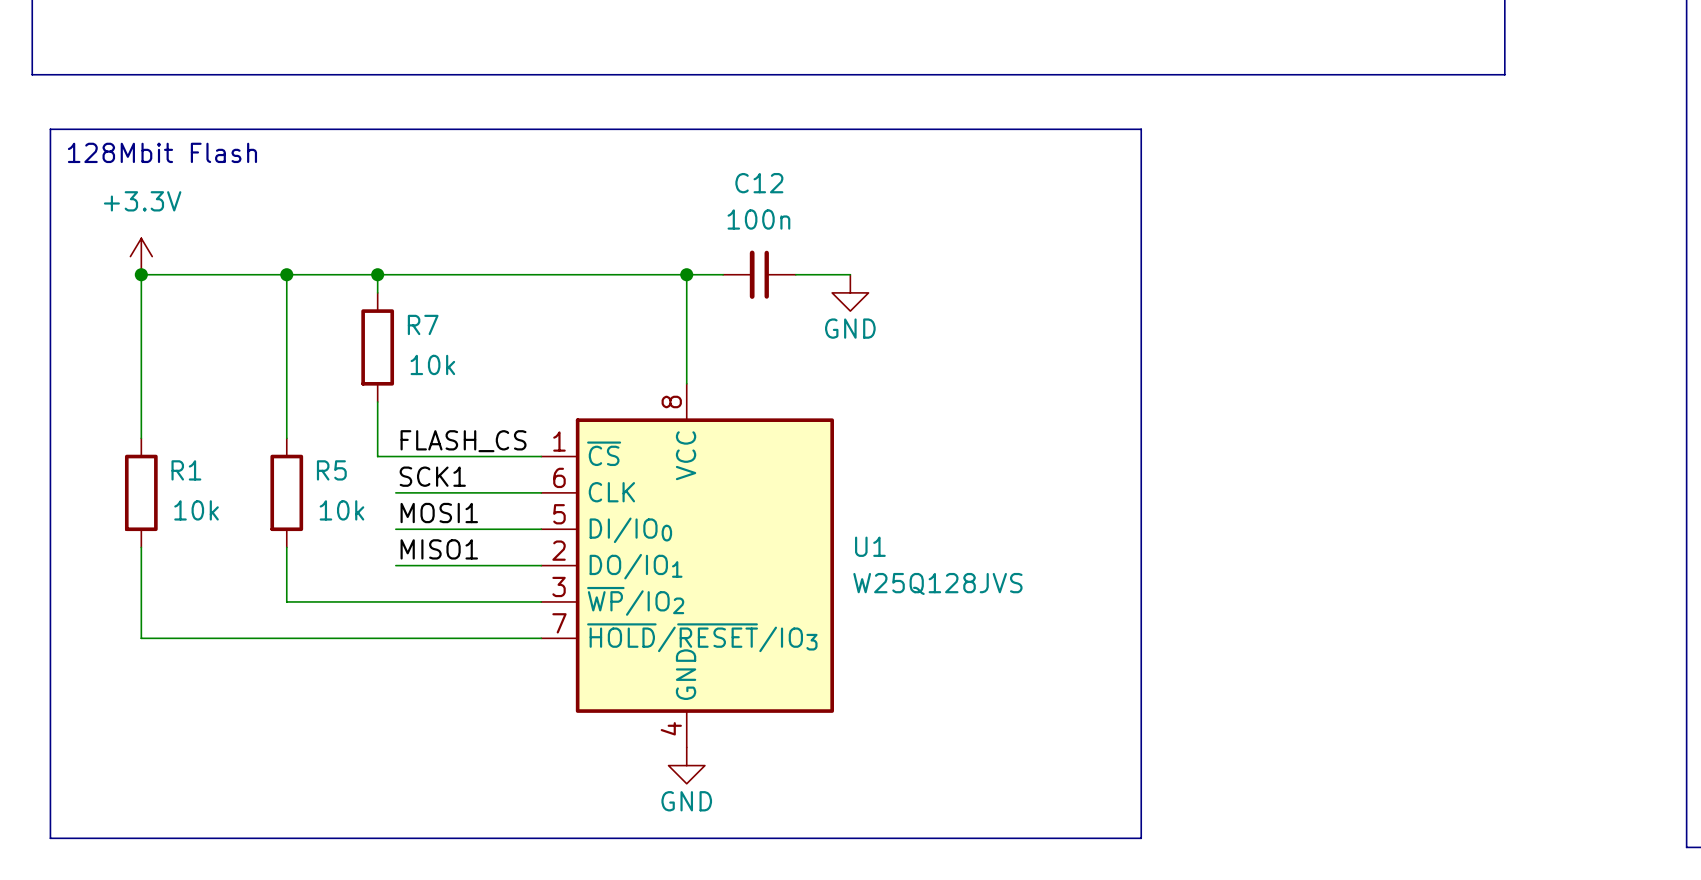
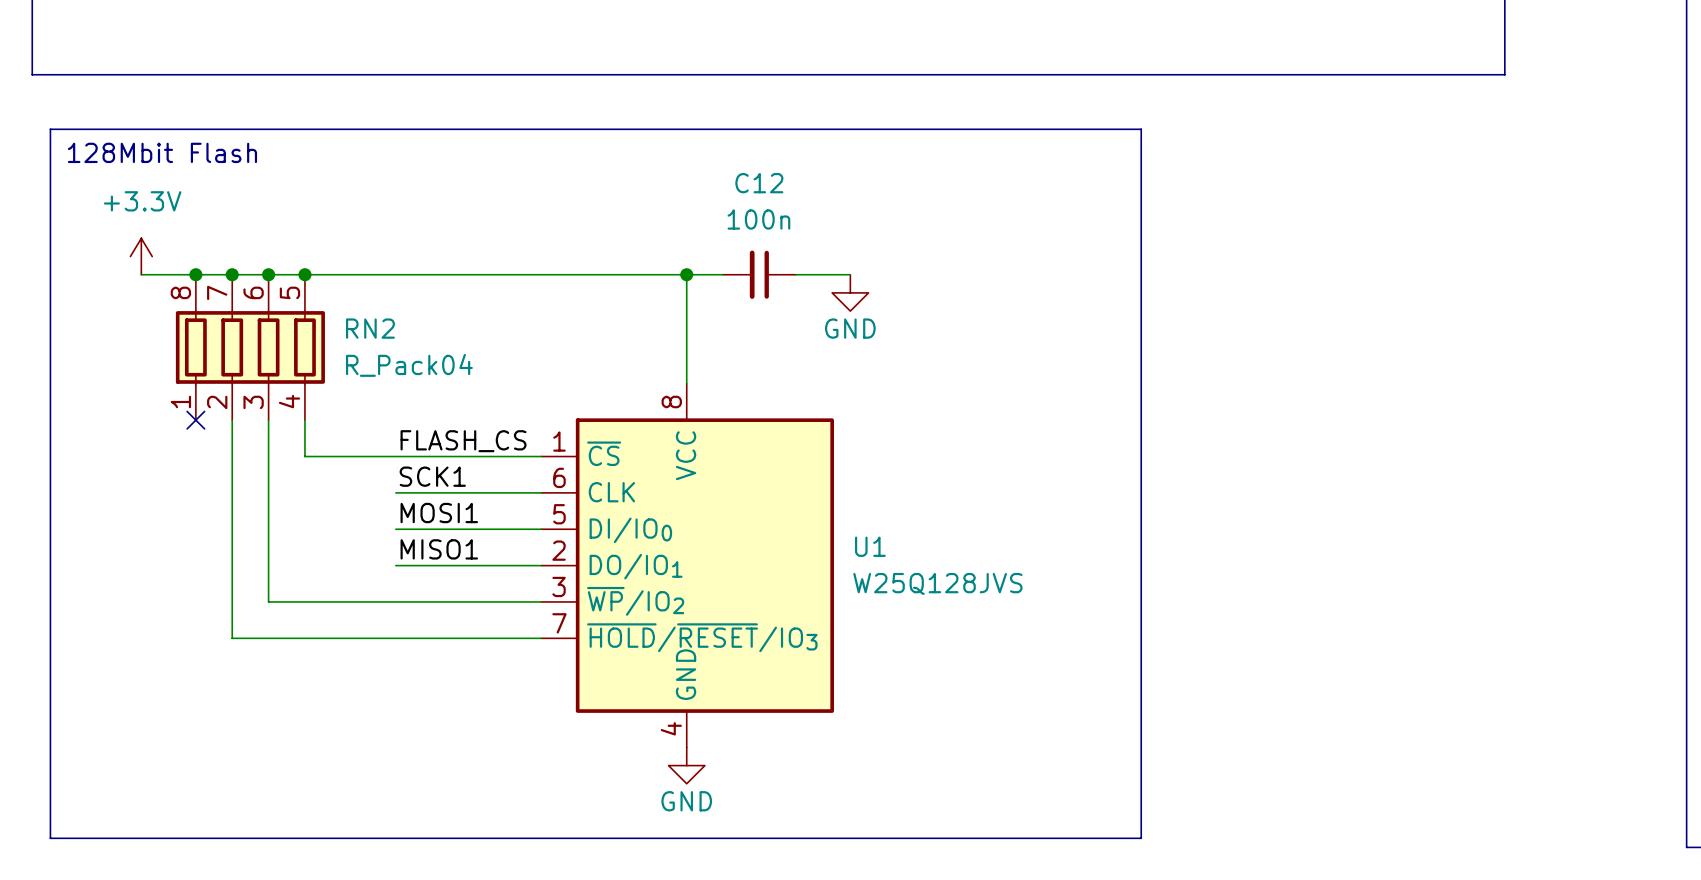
wire: (141, 274) (141, 438) -> none
junction: (141, 274) -> none
junction: none -> (195, 274)
junction: none -> (232, 274)
junction: none -> (268, 274)
wire: (286, 274) (286, 438) -> none
junction: (286, 274) -> none
junction: none -> (304, 274)
wire: (377, 274) (377, 292) -> none
junction: (377, 274) -> none
RN2: none -> R_Pack04 (250, 347)
R7: 10k (377, 347) -> none
wire: (377, 401) (377, 456) -> (304, 420) (304, 456) (377, 456)
no-connect mark: none -> (195, 420)
R1: 10k (141, 492) -> none
R5: 10k (286, 492) -> none
wire: (141, 547) (141, 638) (232, 638) -> (232, 420) (232, 638)
wire: (286, 547) (286, 601) -> (268, 420) (268, 601) (286, 601)

